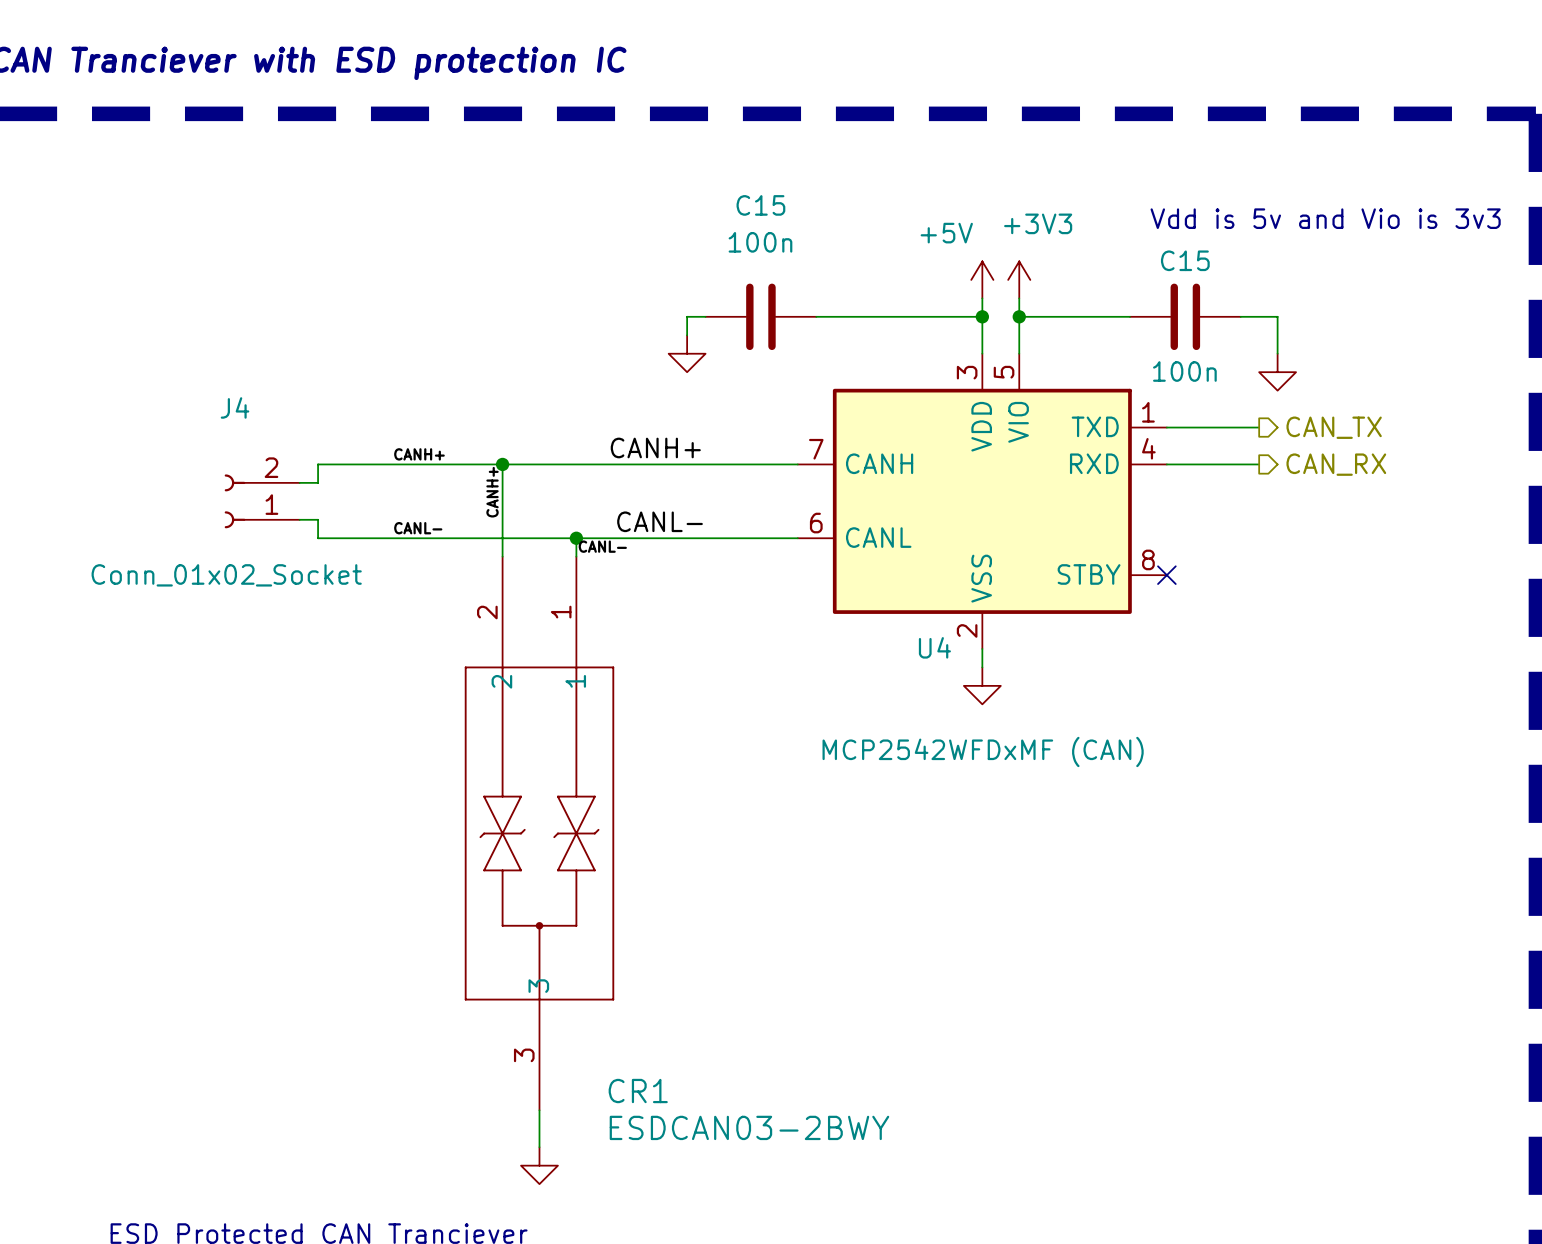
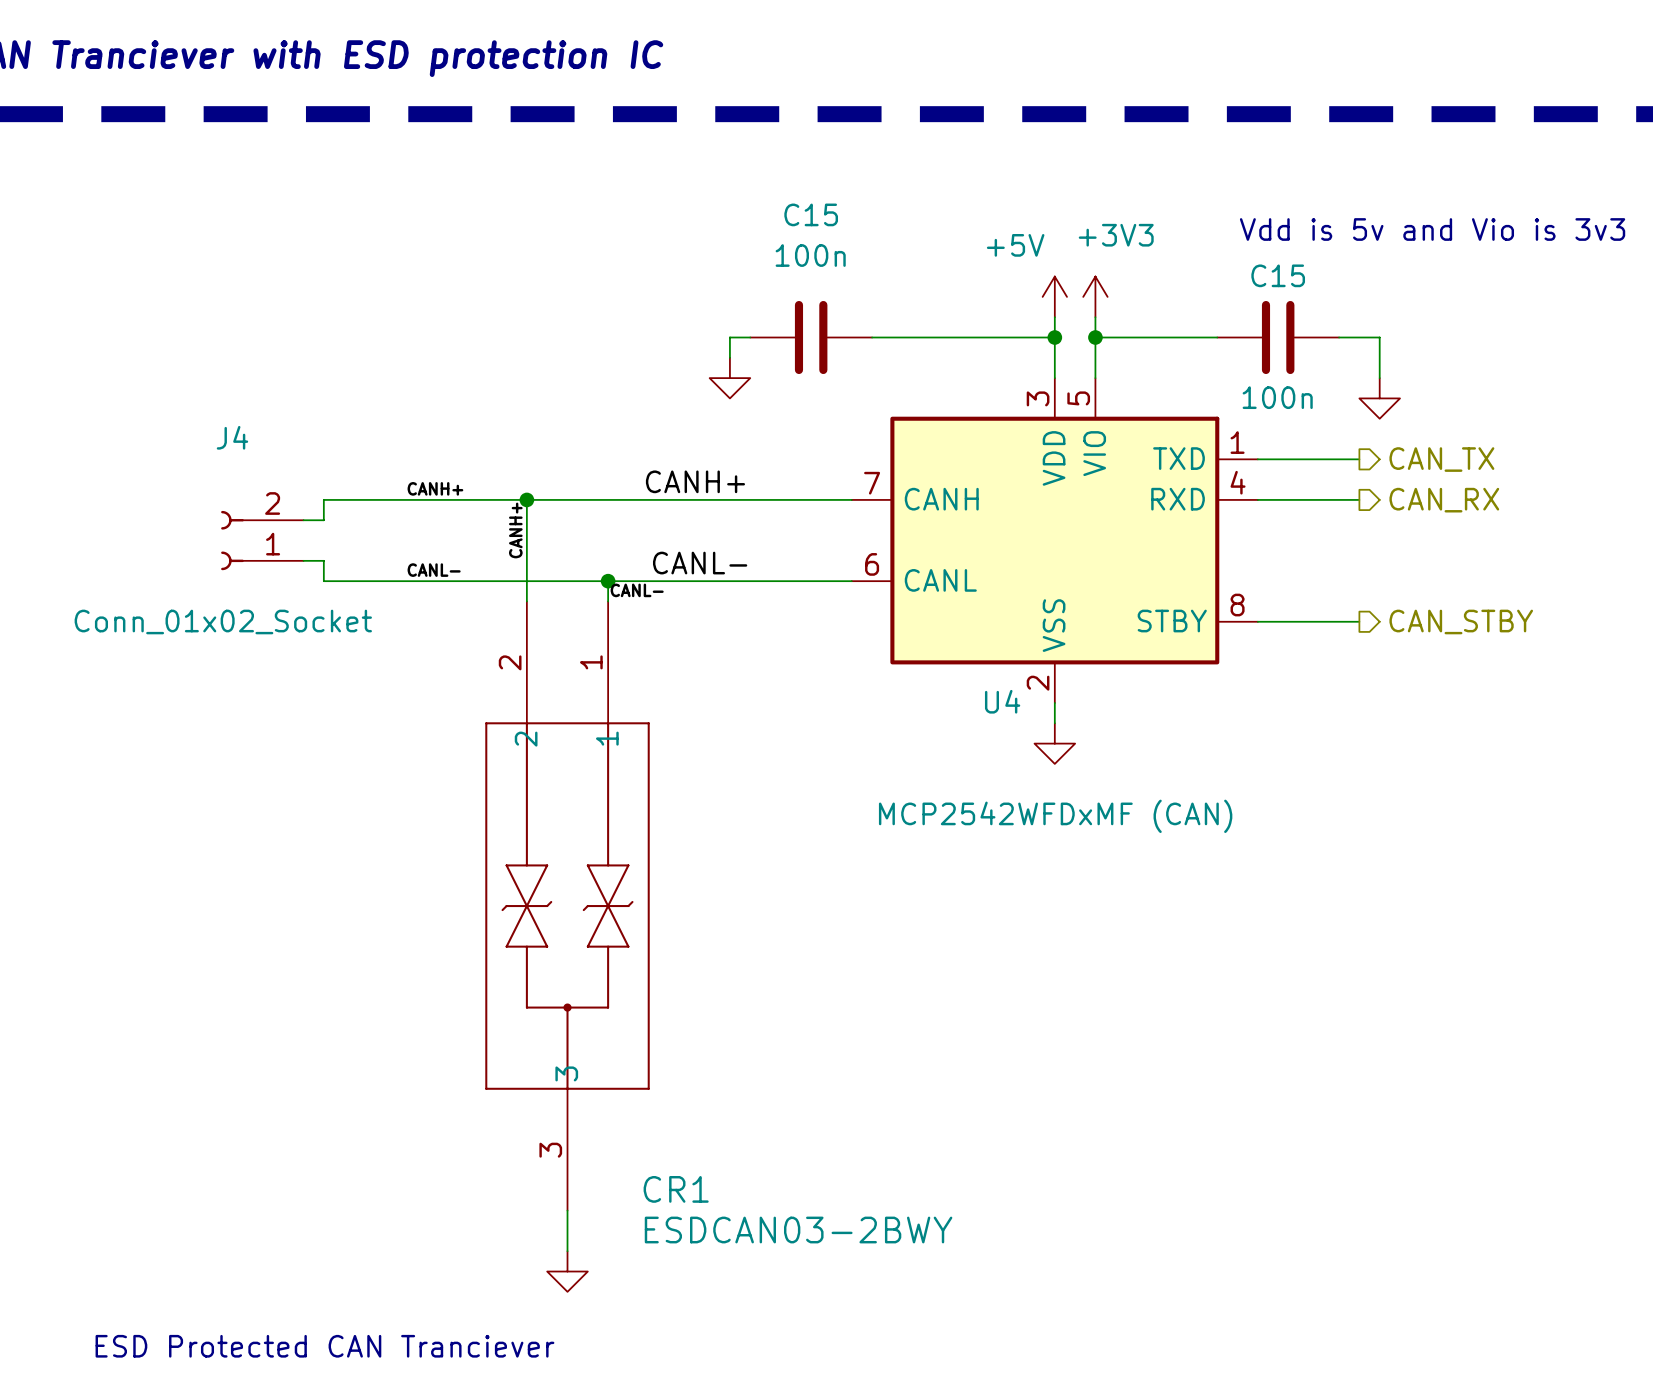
wire: none -> (1257, 621) (1359, 621)
no-connect mark: (1166, 575) -> none
hierarchical label: none -> CAN_STBY (1461, 621)

